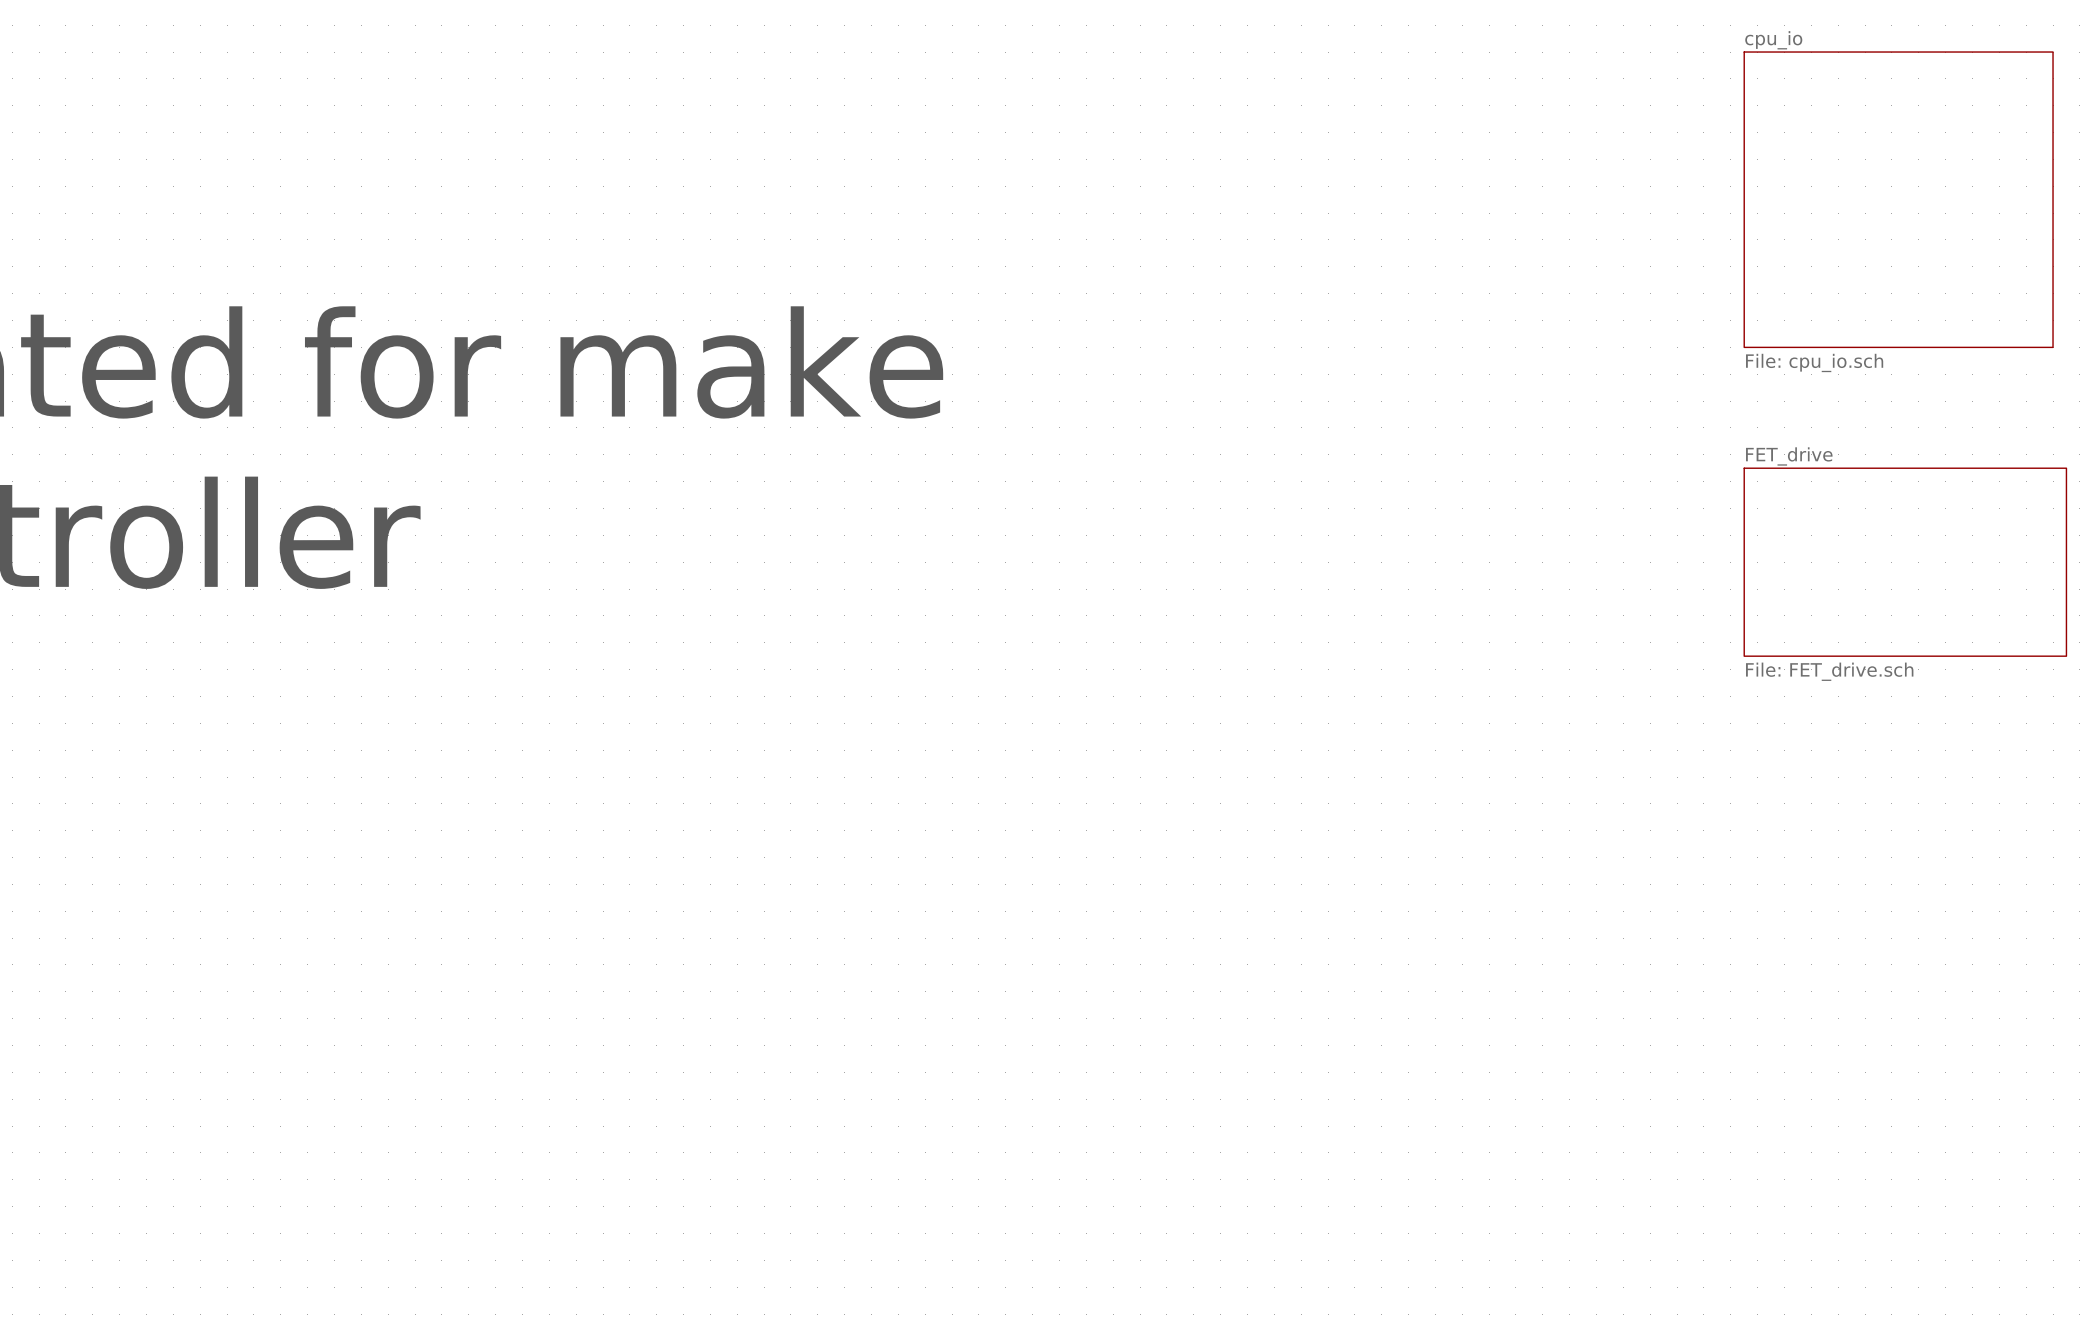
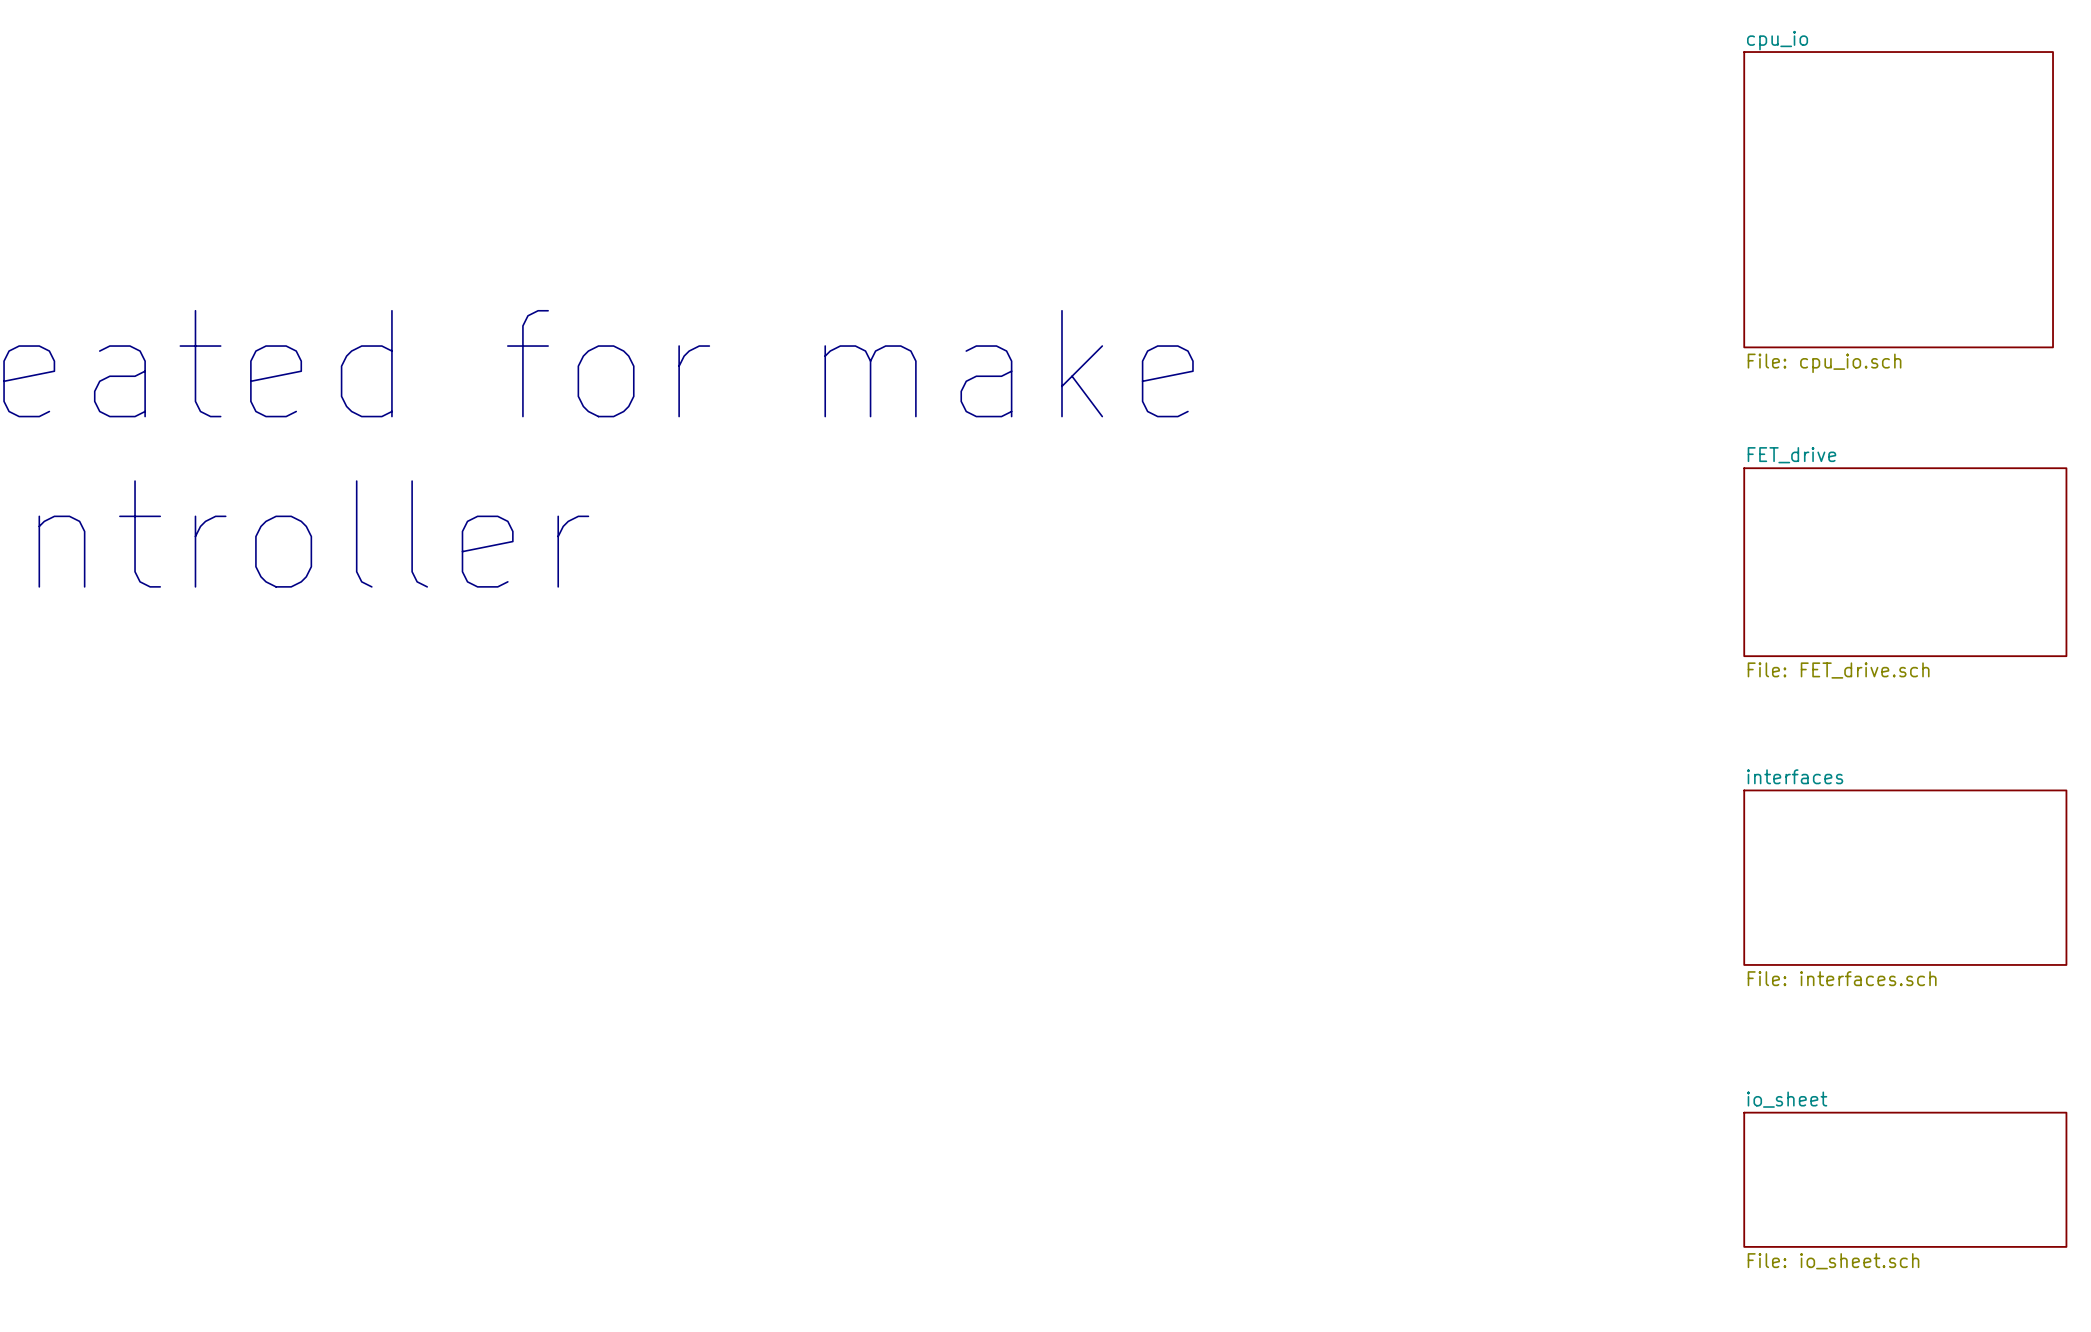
sheet interfaces: none -> File: interfaces.sch (1905, 877)
sheet io_sheet: none -> File: io_sheet.sch (1905, 1179)

